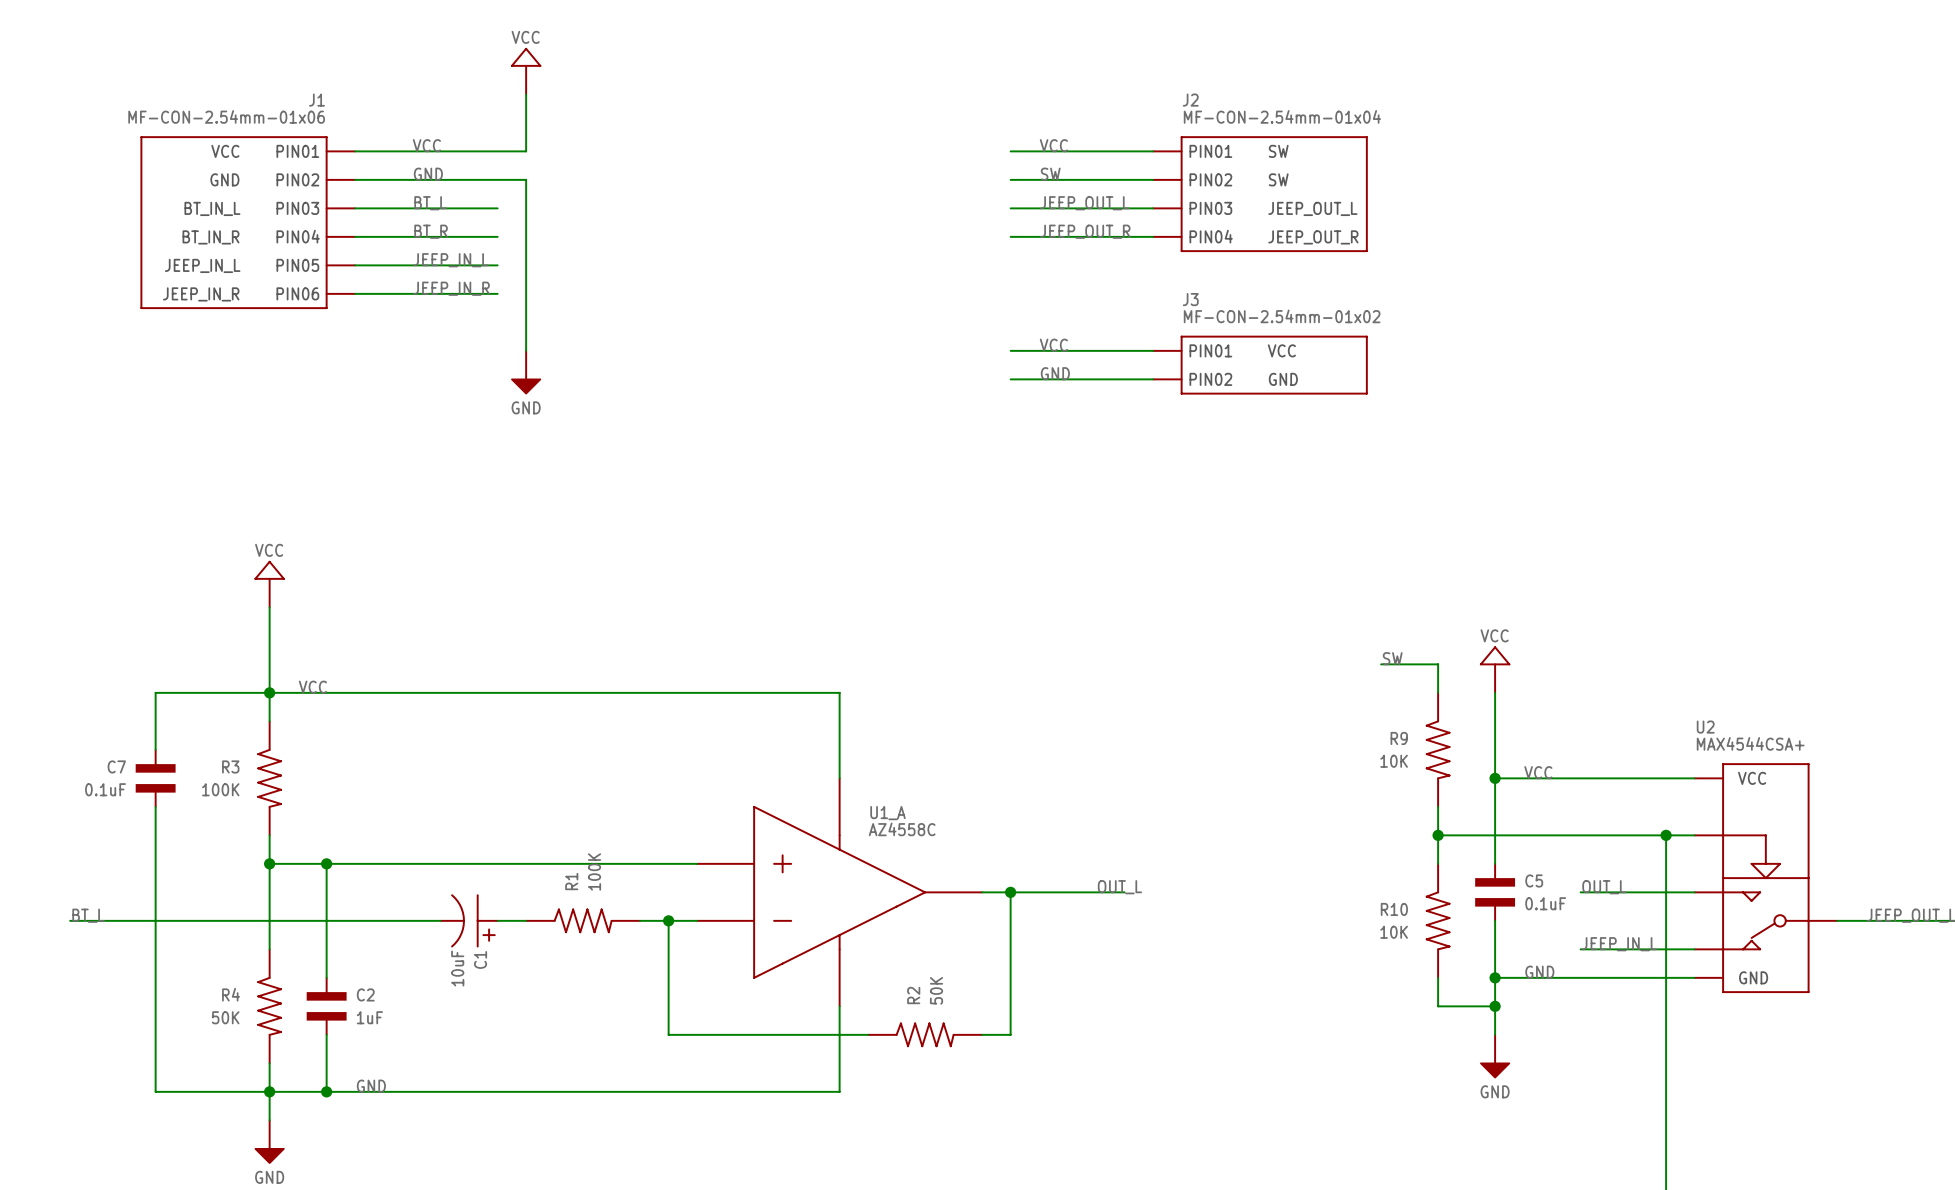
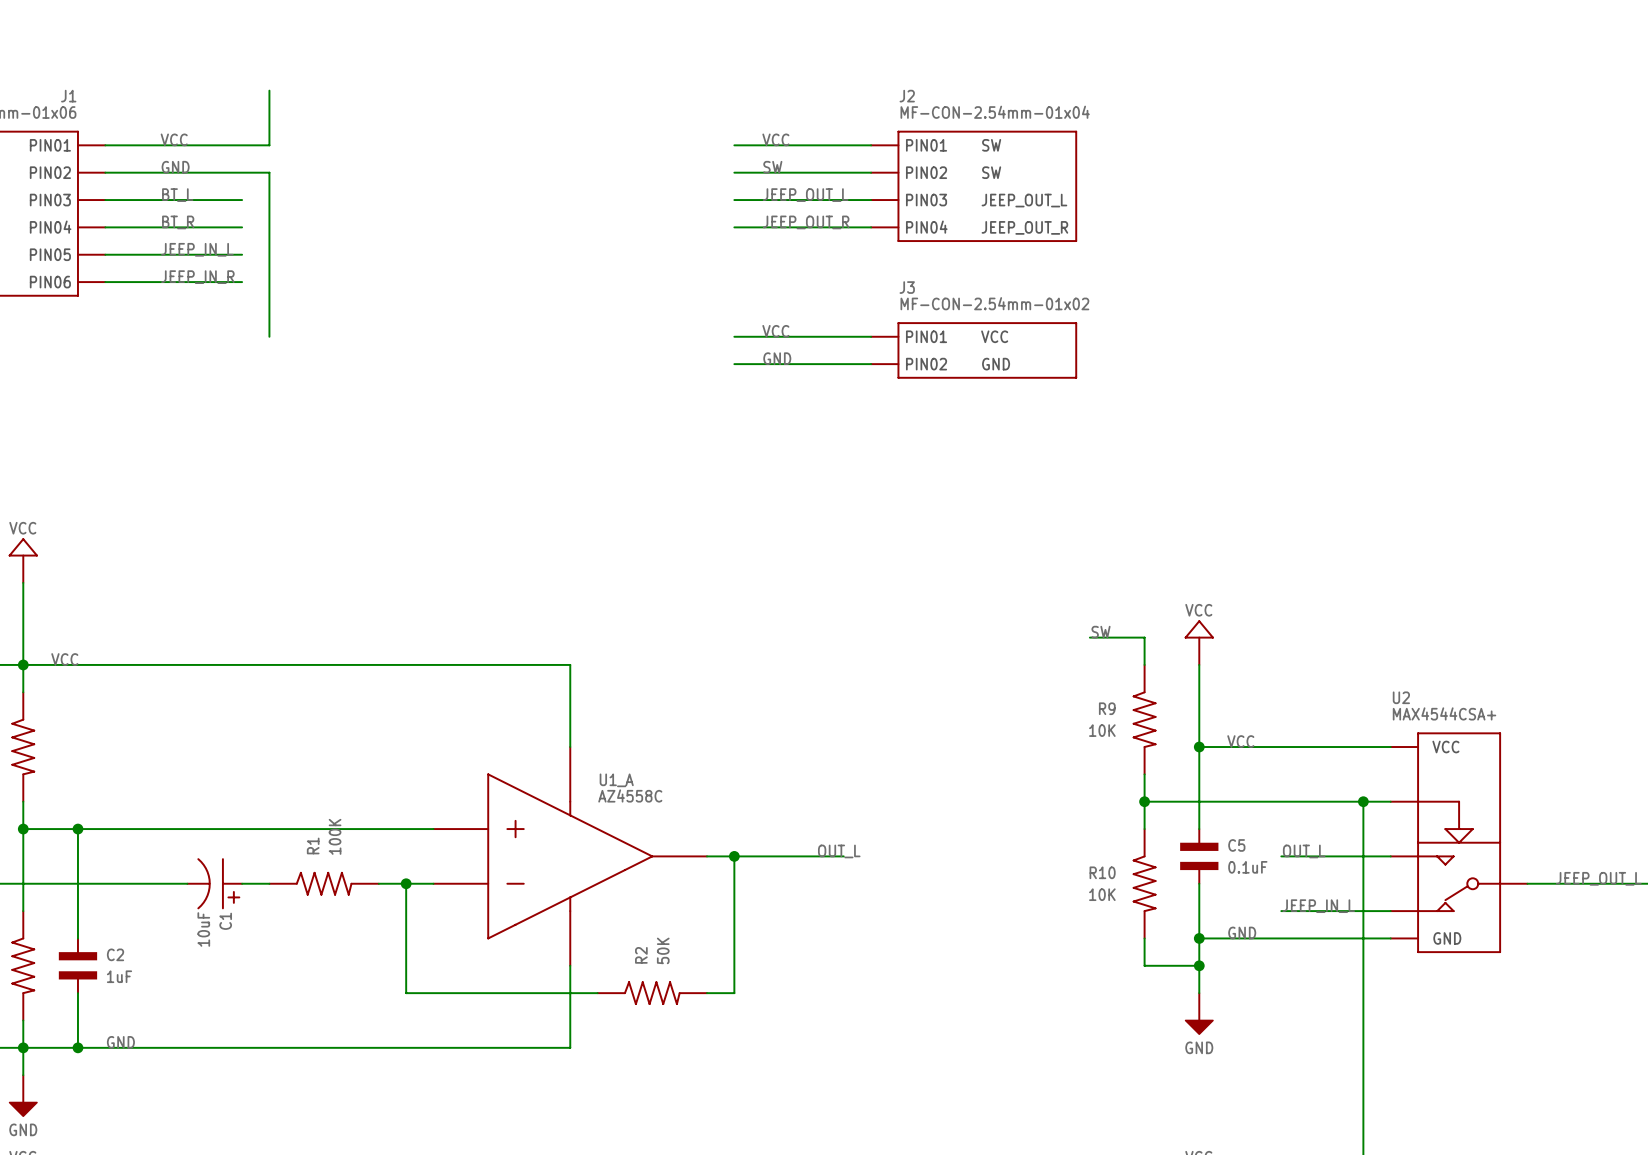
power symbol: VCC (526, 71) -> none
power symbol: GND (526, 372) -> none

